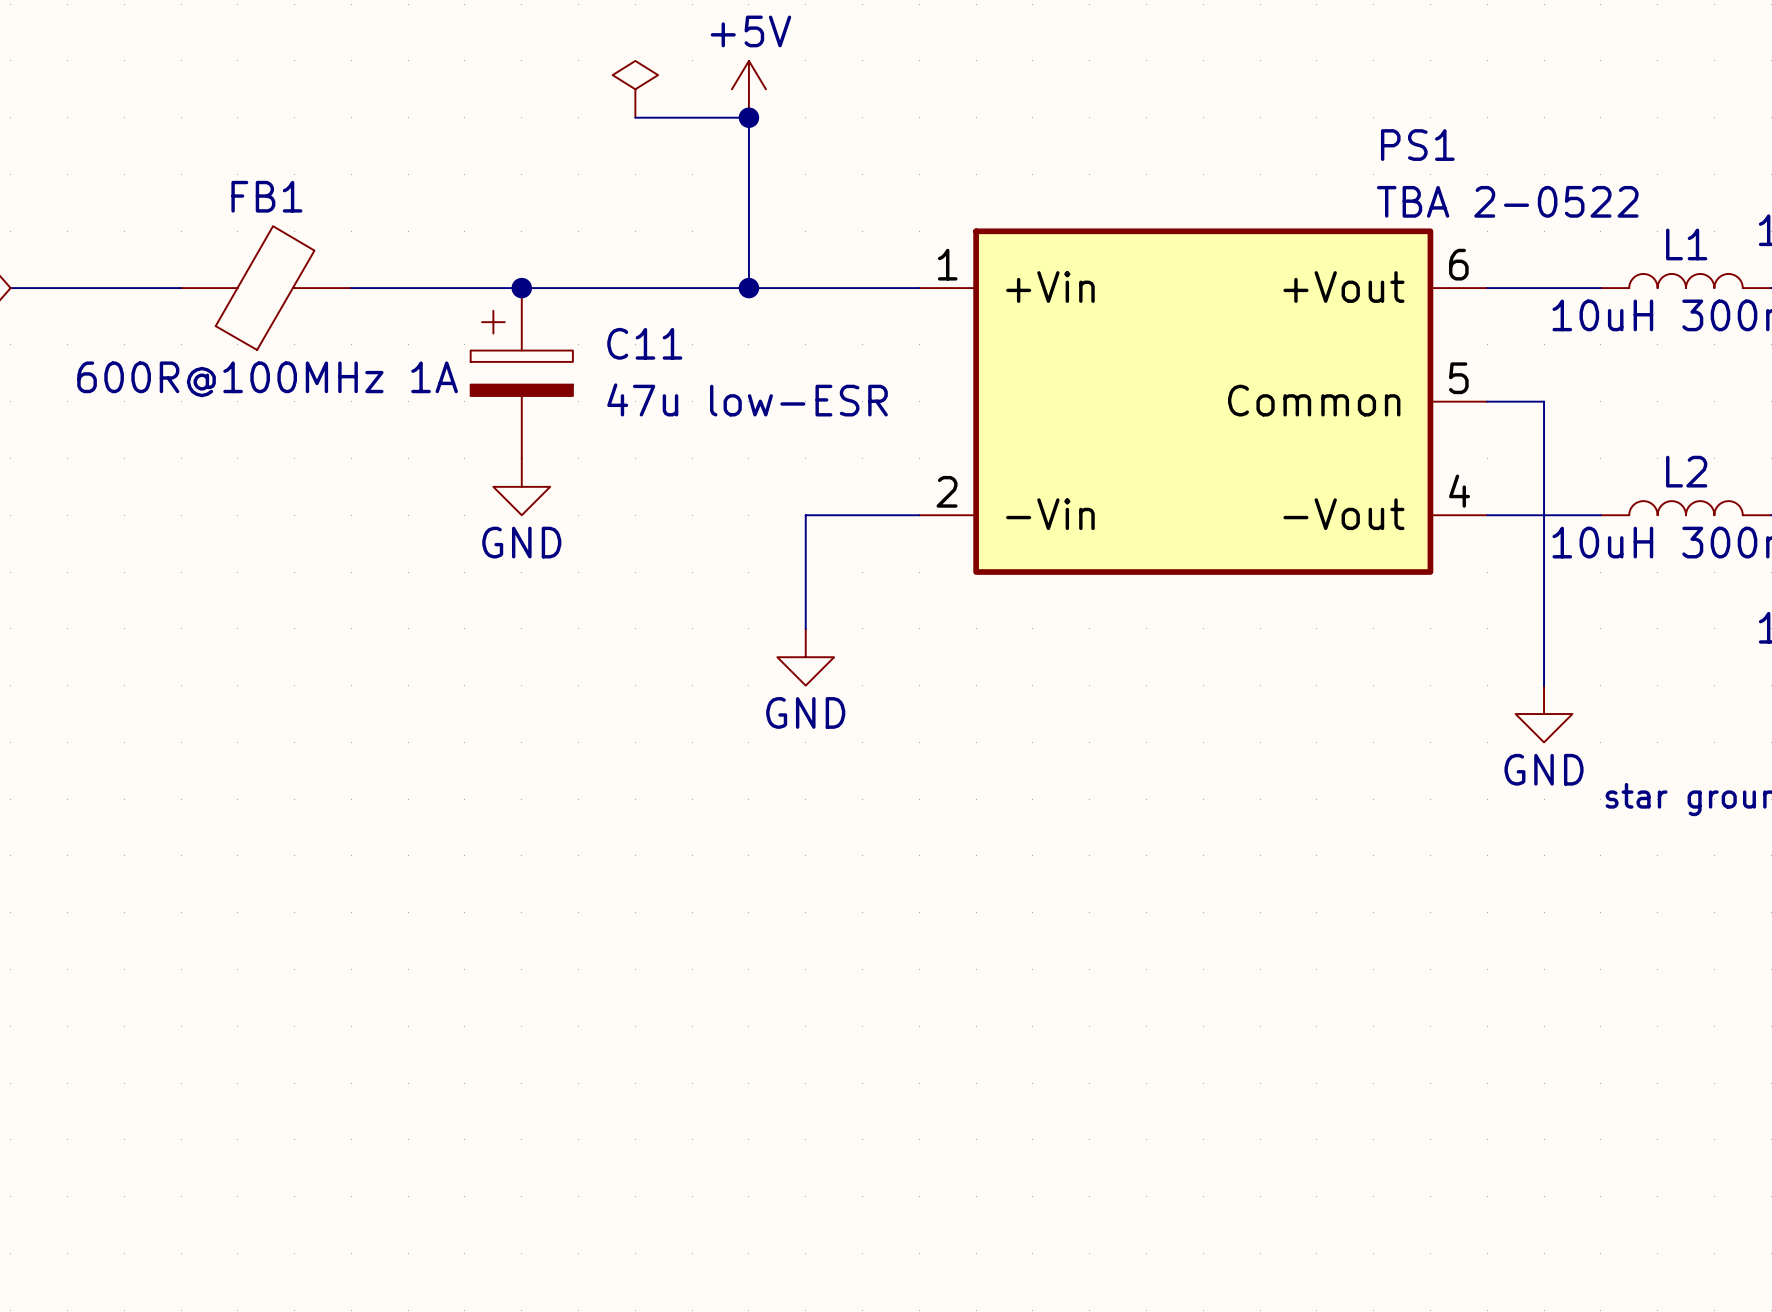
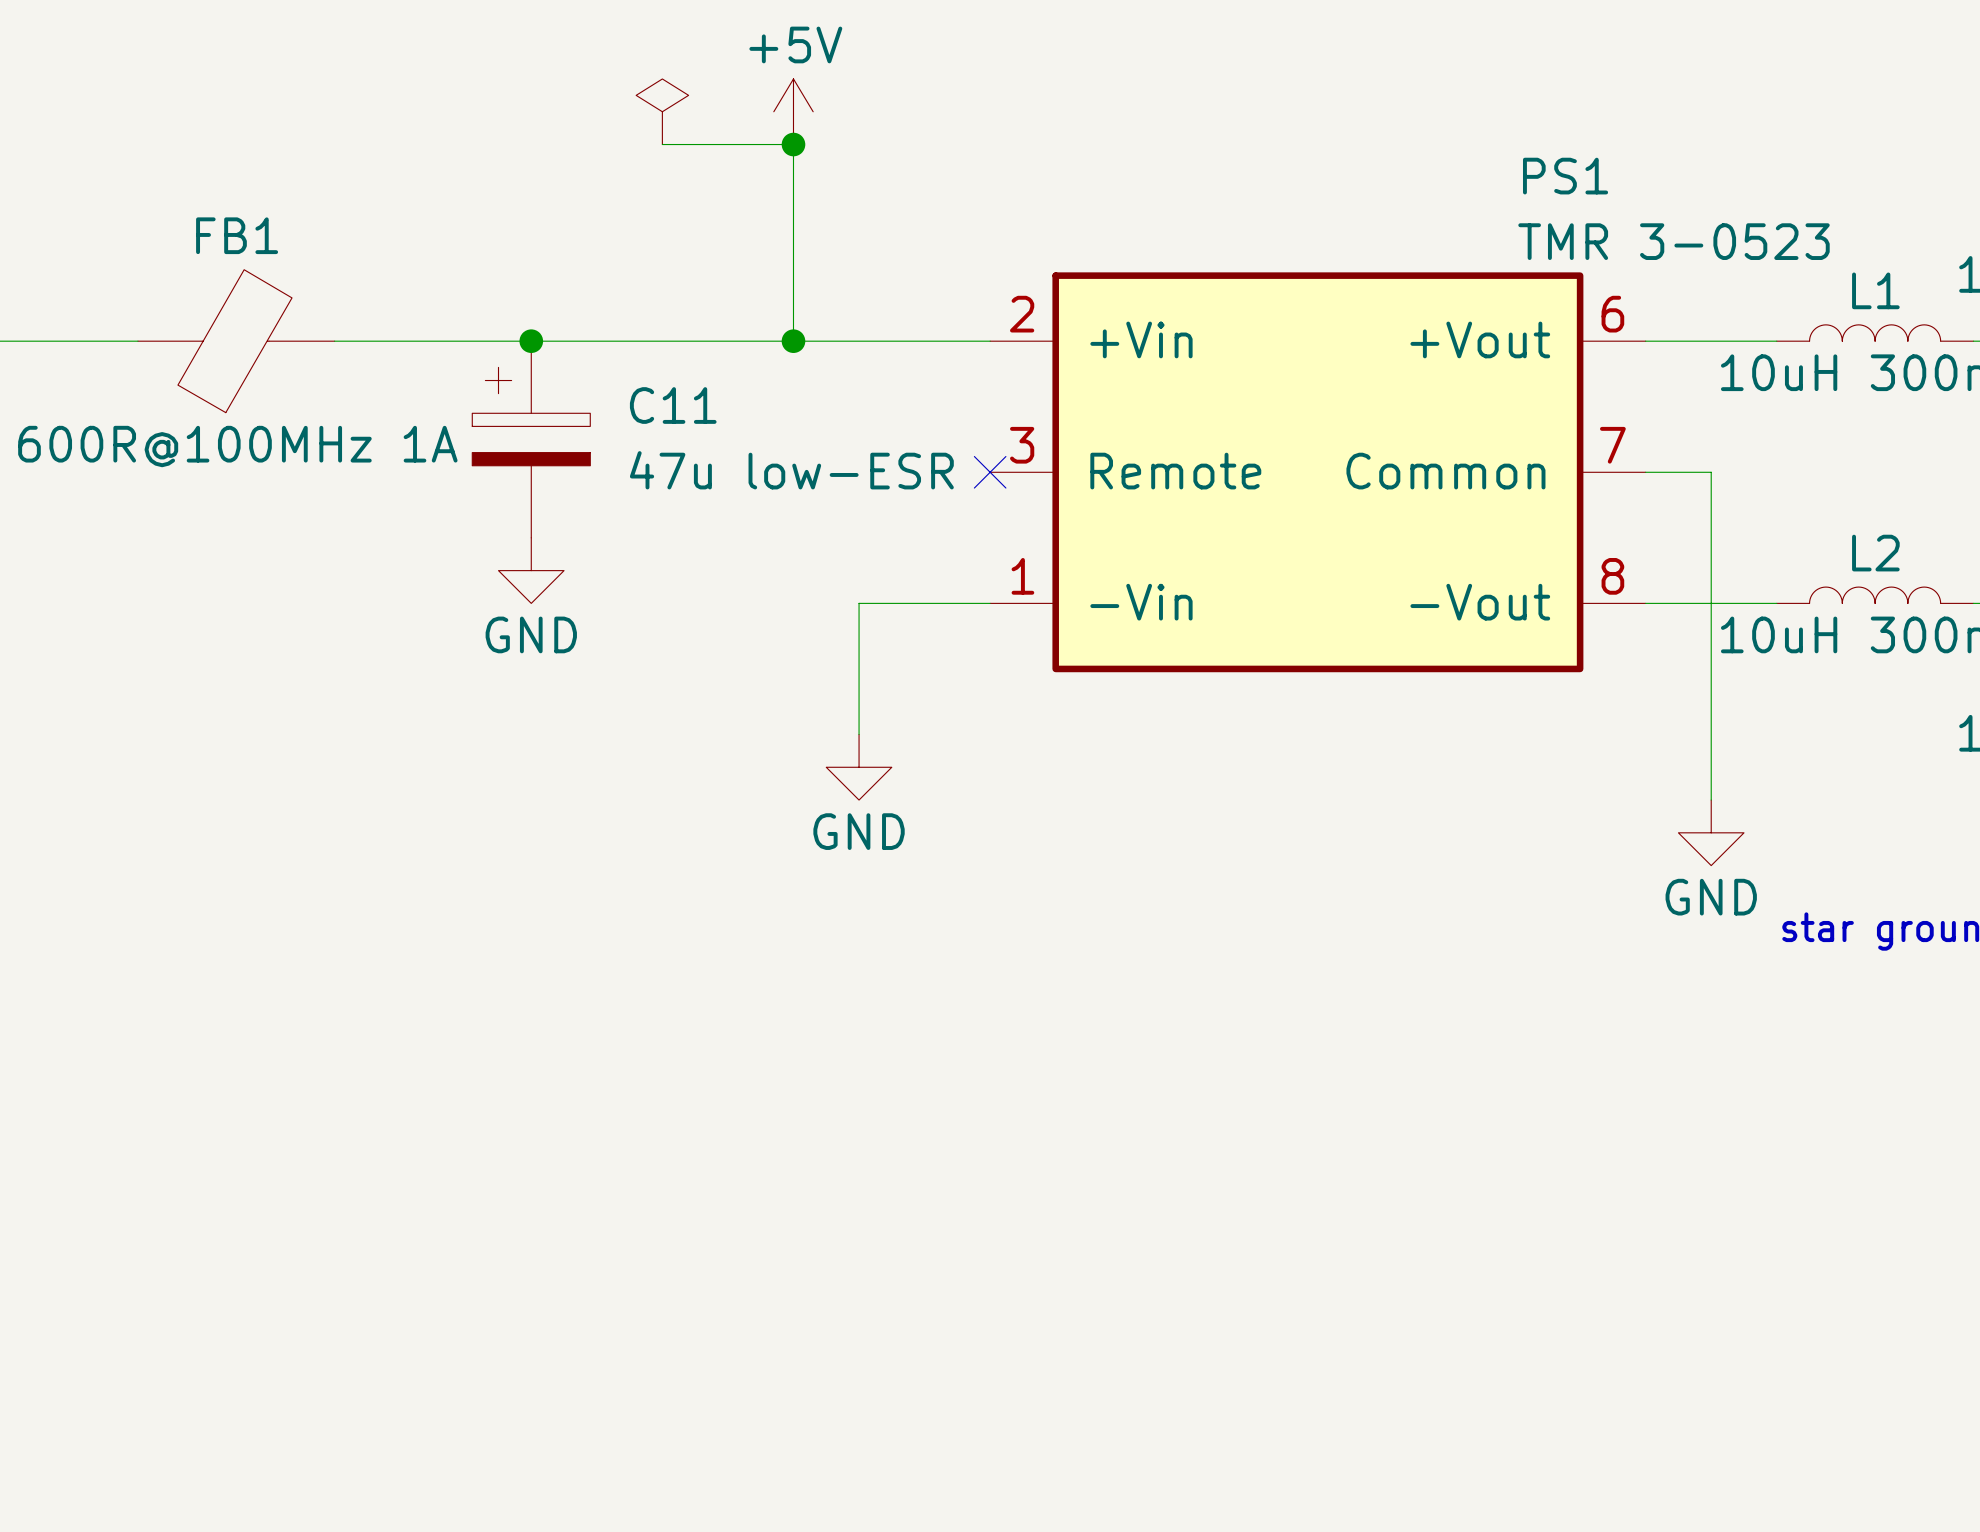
PS1 value: TBA 2-0522 (1507, 201) -> TMR 3-0523 (1674, 241)
PS1 symbol: [919, 228, 1488, 575] -> [990, 272, 1646, 673]
no-connect mark: none -> (990, 472)

